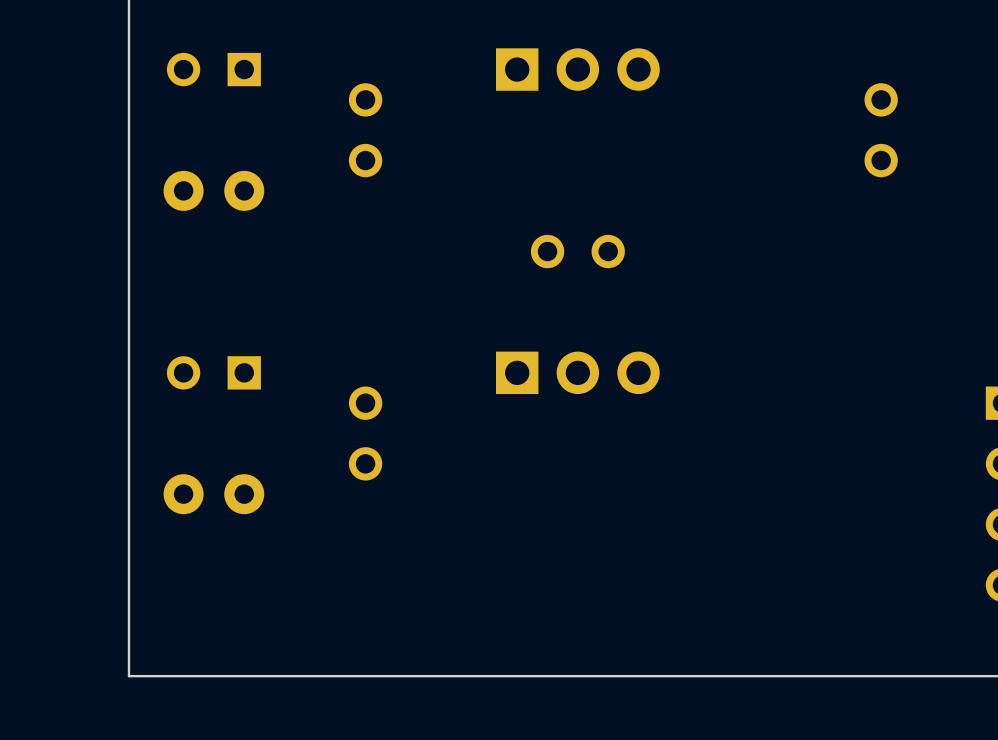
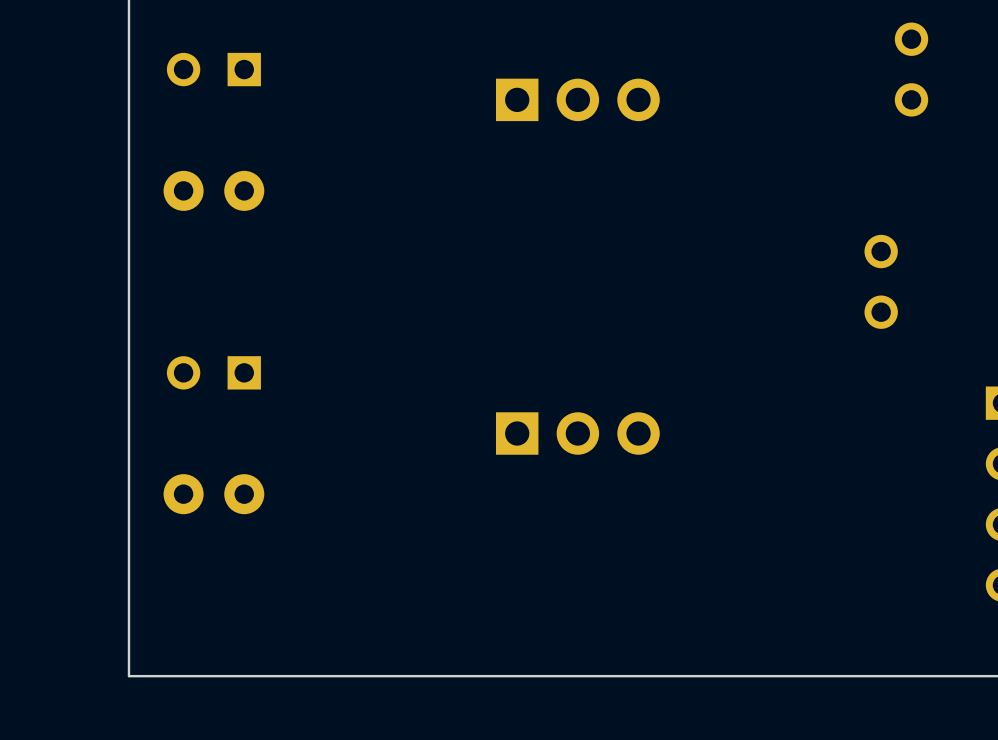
part position: (577, 69) -> (577, 99)
part: (365, 130) -> none
part position: (881, 130) -> (911, 69)
part: (577, 251) -> none
part: none -> (881, 281)
part position: (577, 372) -> (577, 433)
part: (365, 433) -> none

